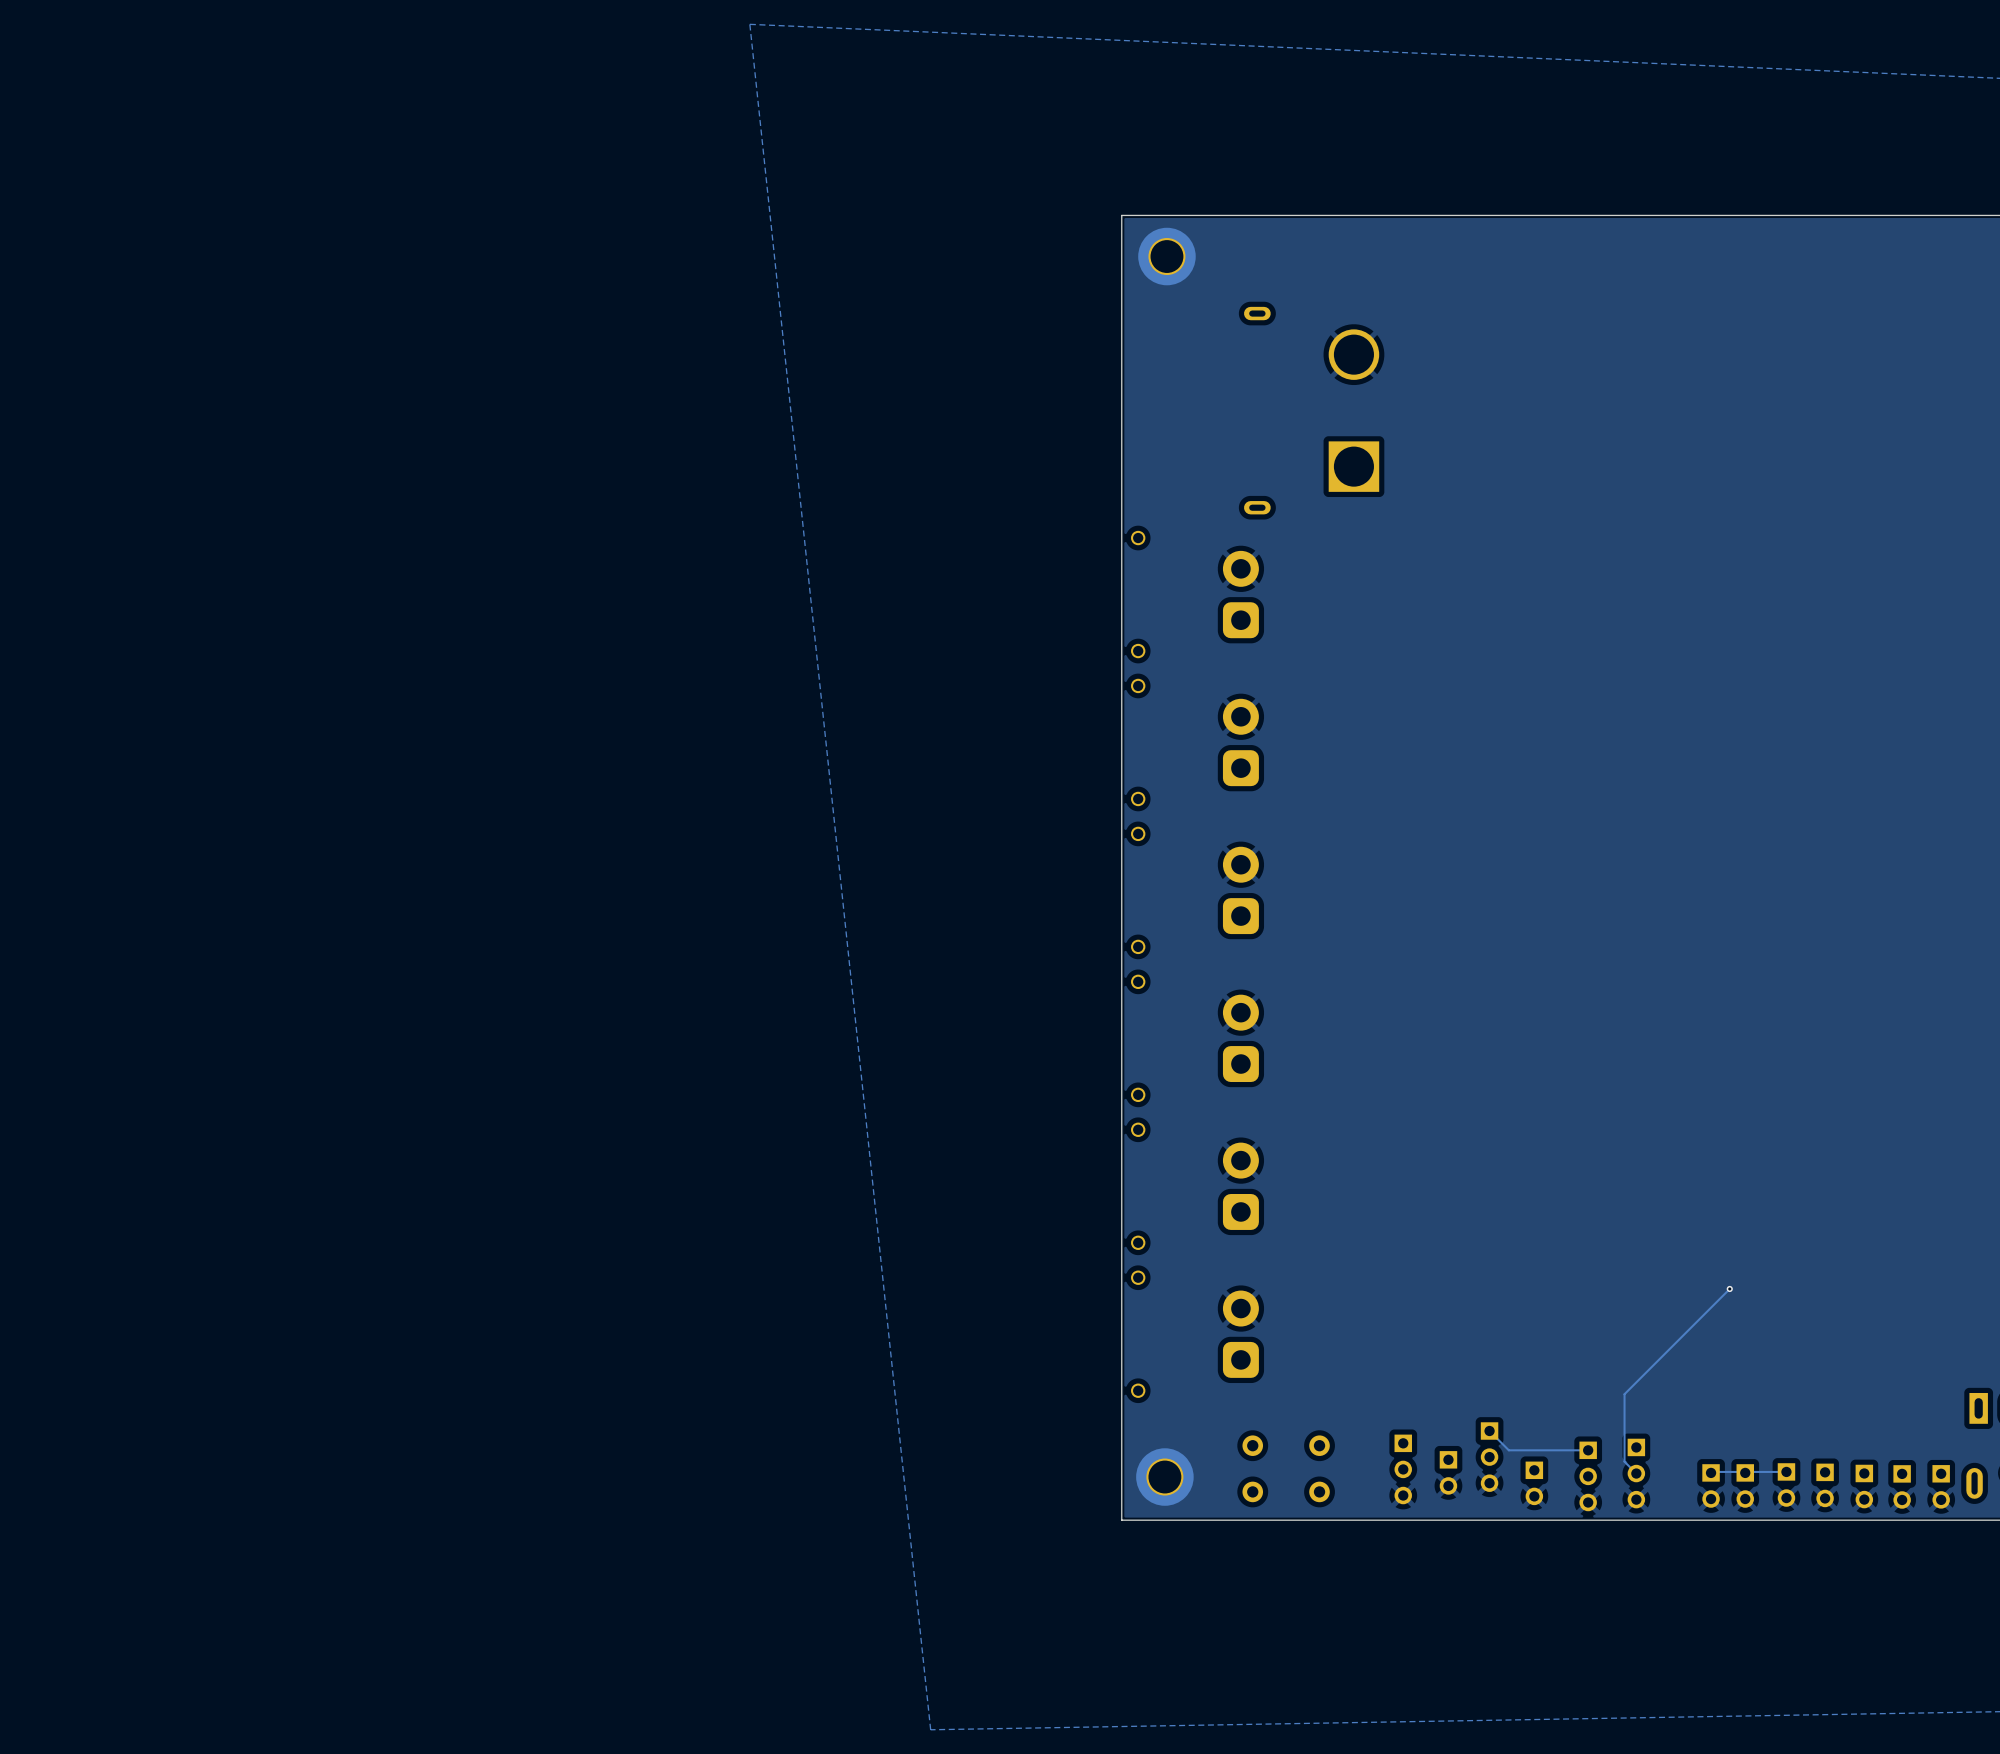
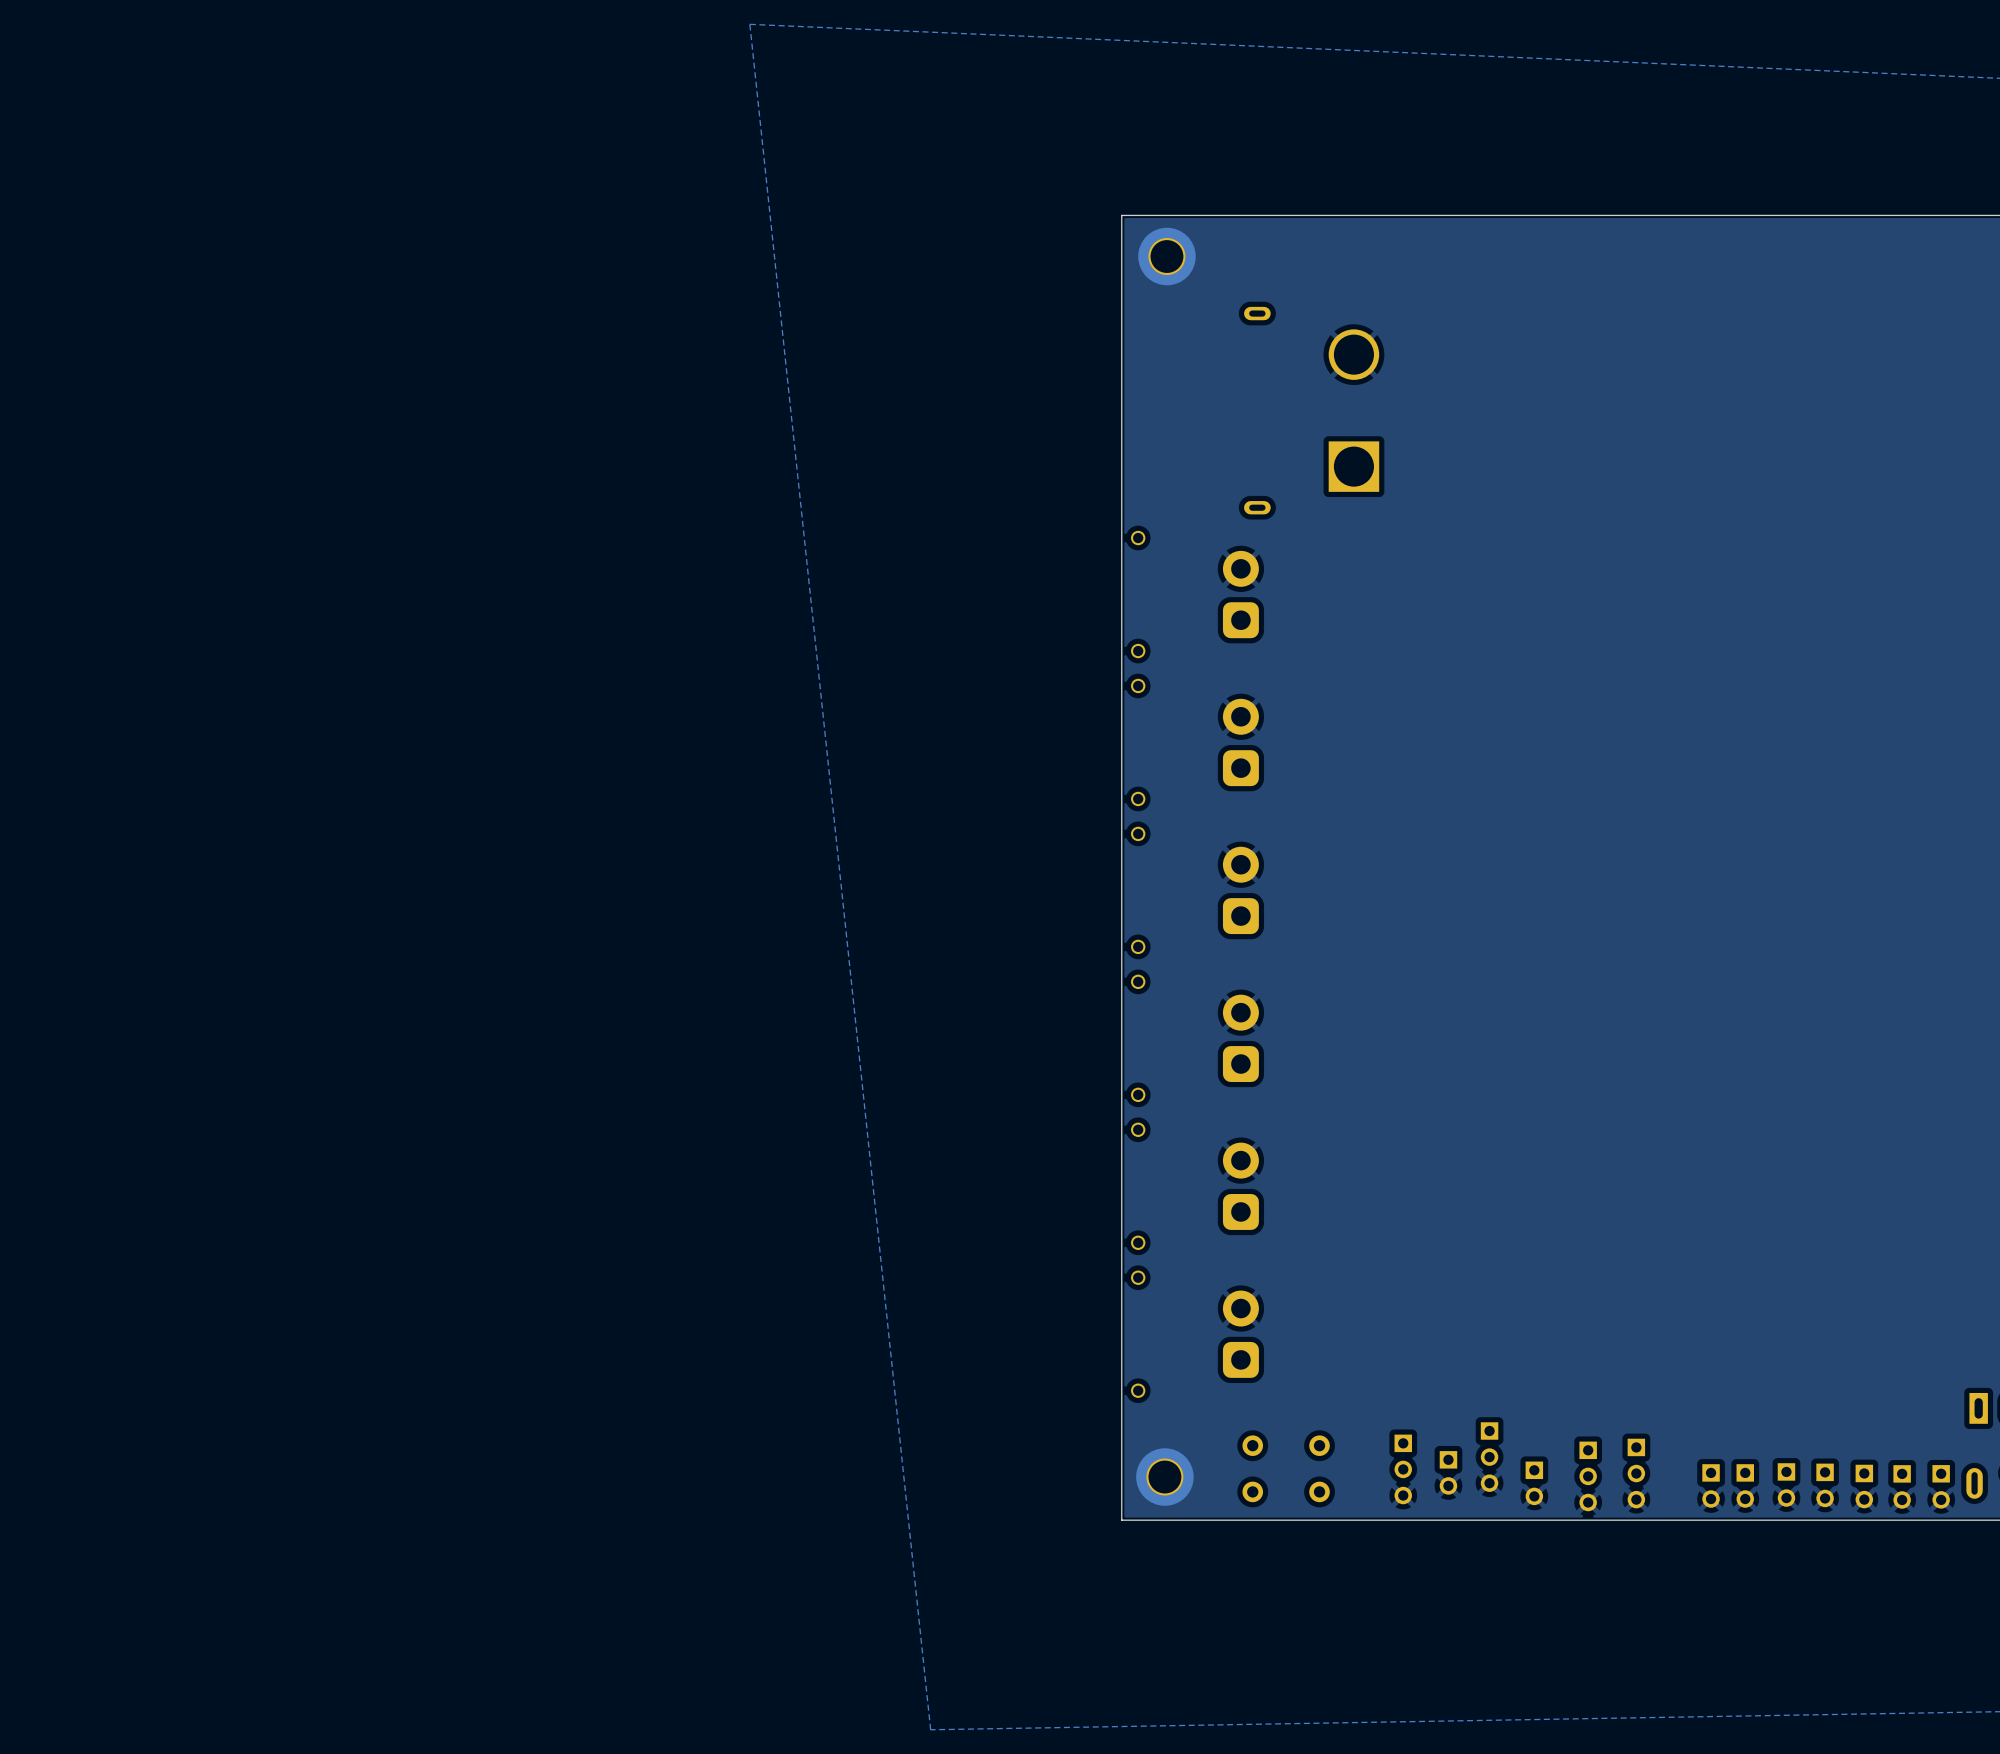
track: (1729, 1288) (1624, 1394) (1624, 1461) (1636, 1473) -> none
via: (1729, 1288) -> none
track: (1489, 1431) (1508, 1450) (1588, 1450) -> none
track: (1786, 1471) (1711, 1472) -> none

